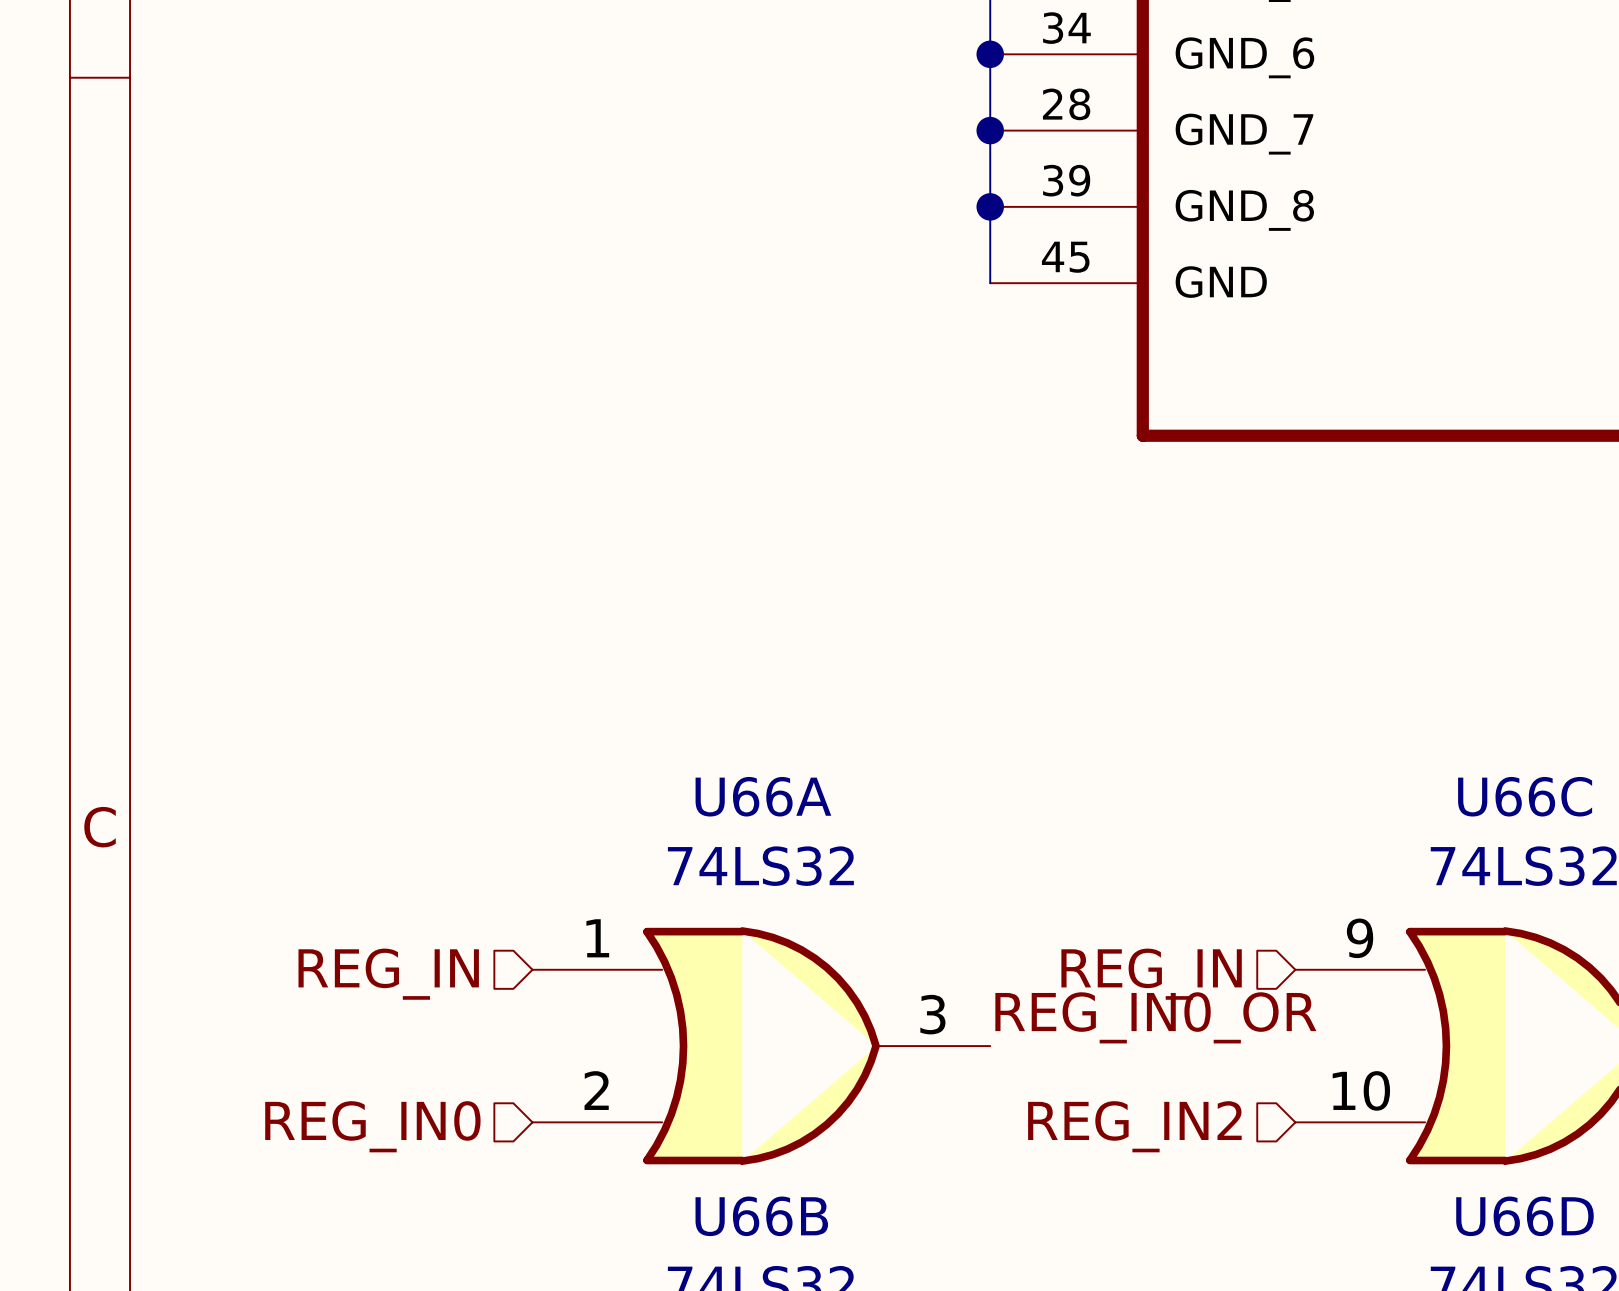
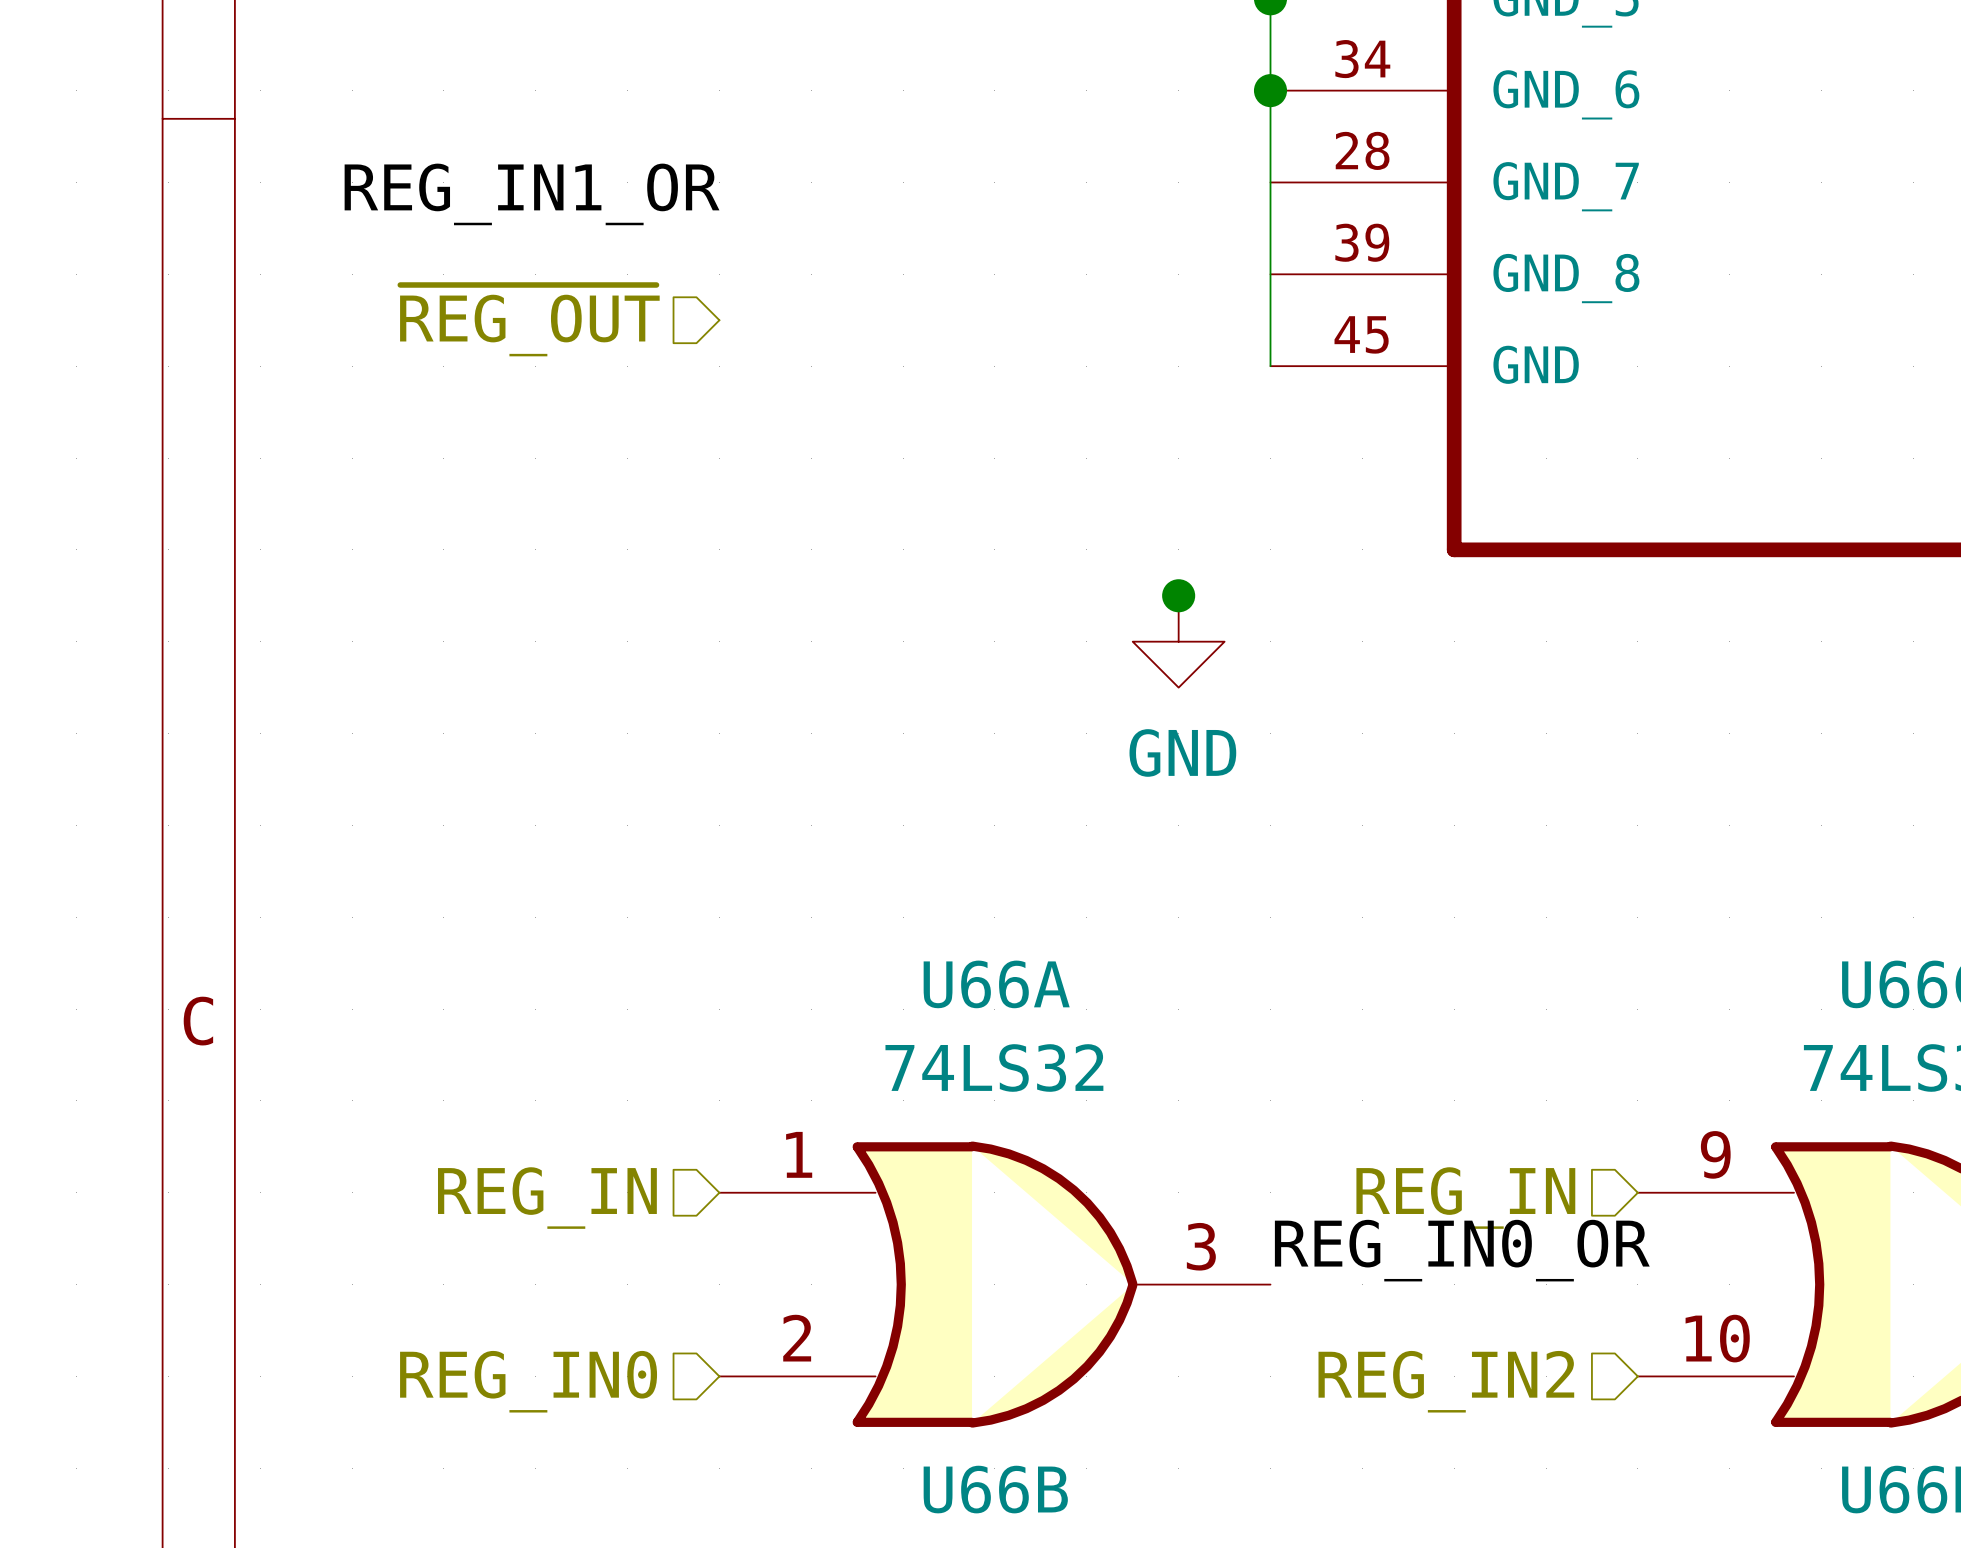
junction: (990, 130) -> none
label: none -> REG_IN1_OR (532, 194)
junction: (990, 206) -> none
hierarchical label: none -> ~{REG_OUT} (529, 320)
junction: none -> (1178, 595)
power symbol: none -> GND (1178, 641)

